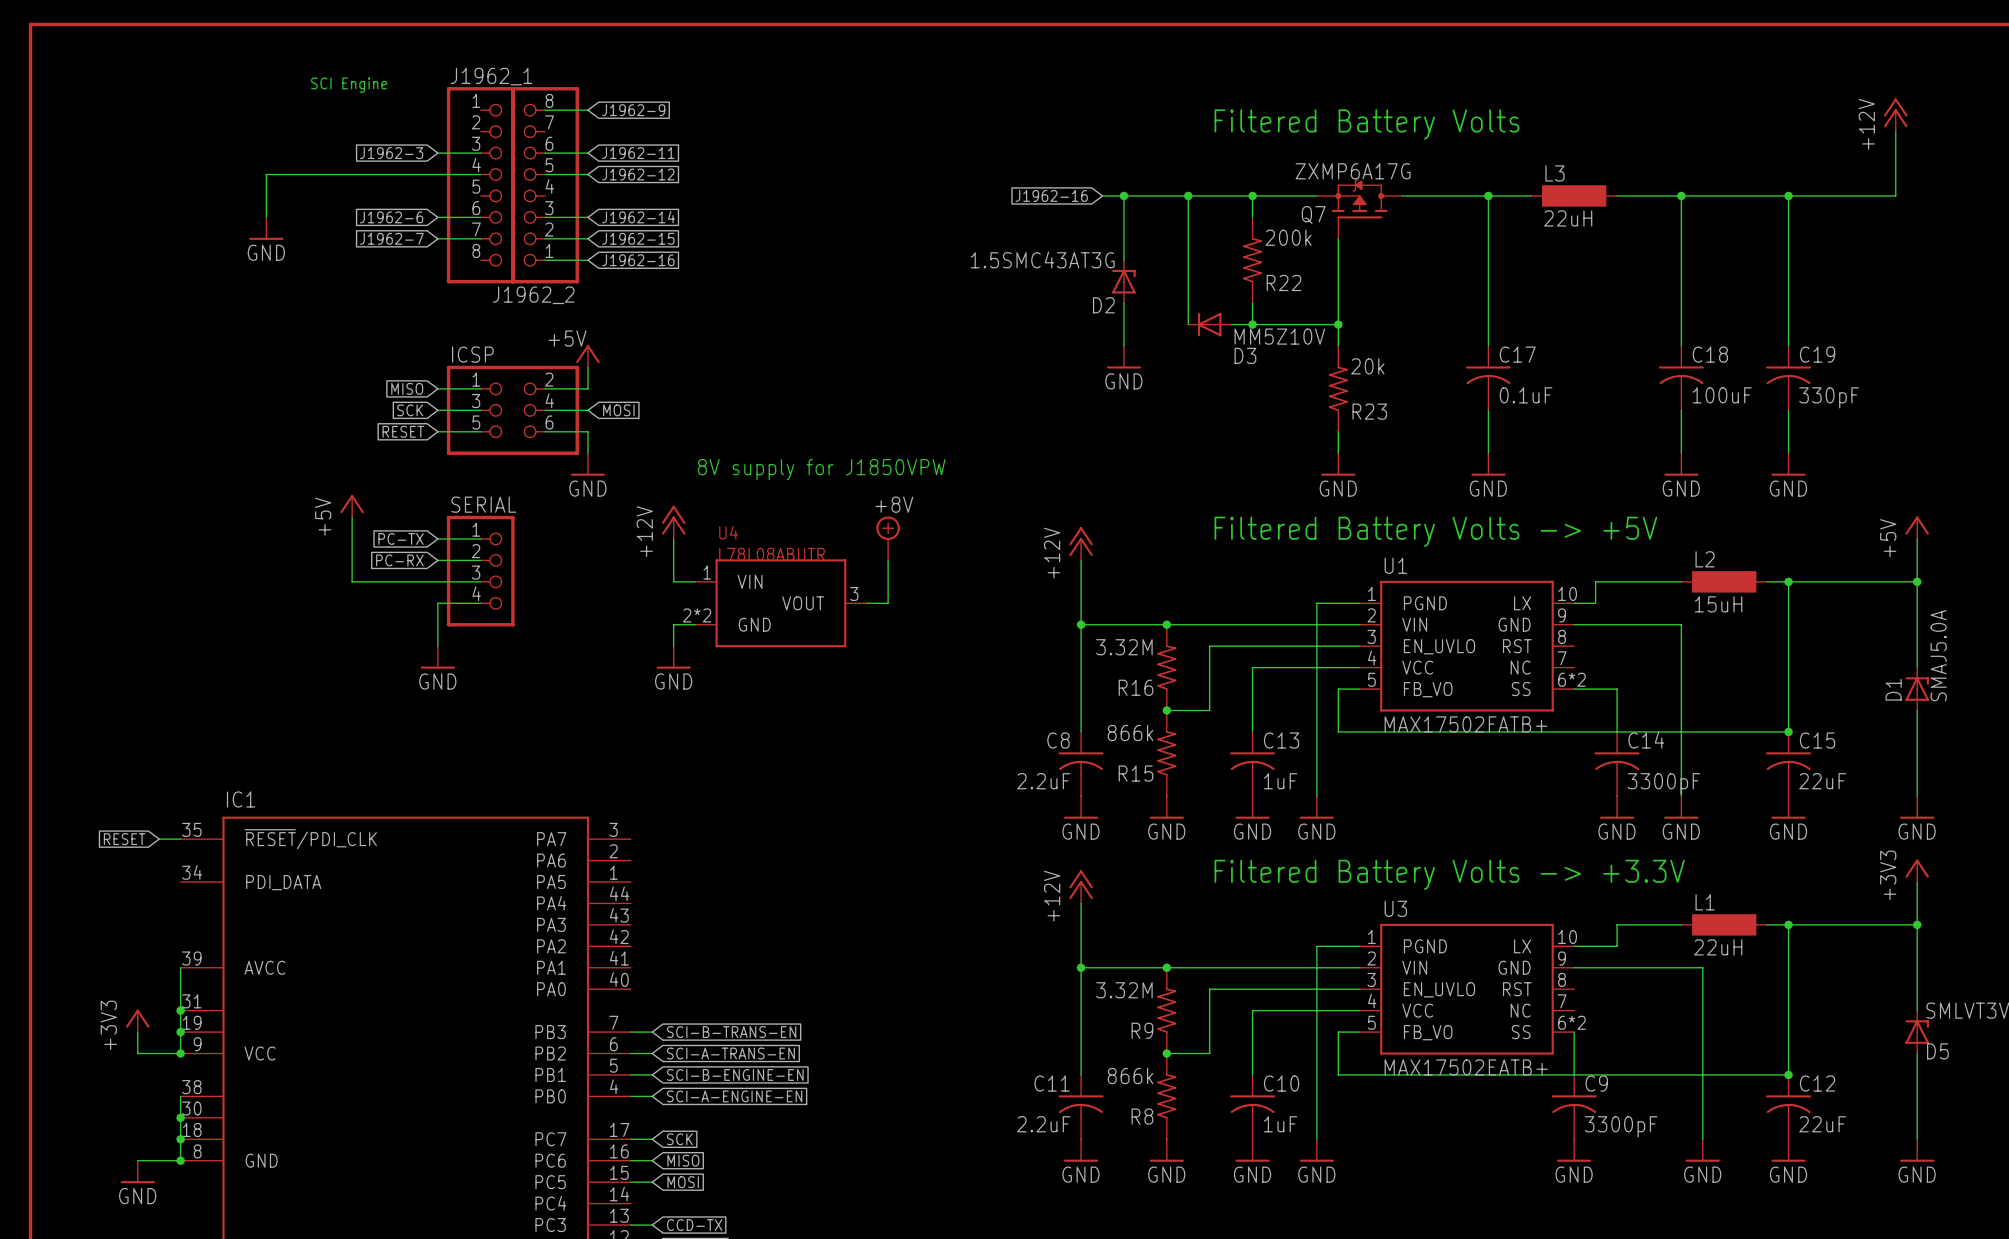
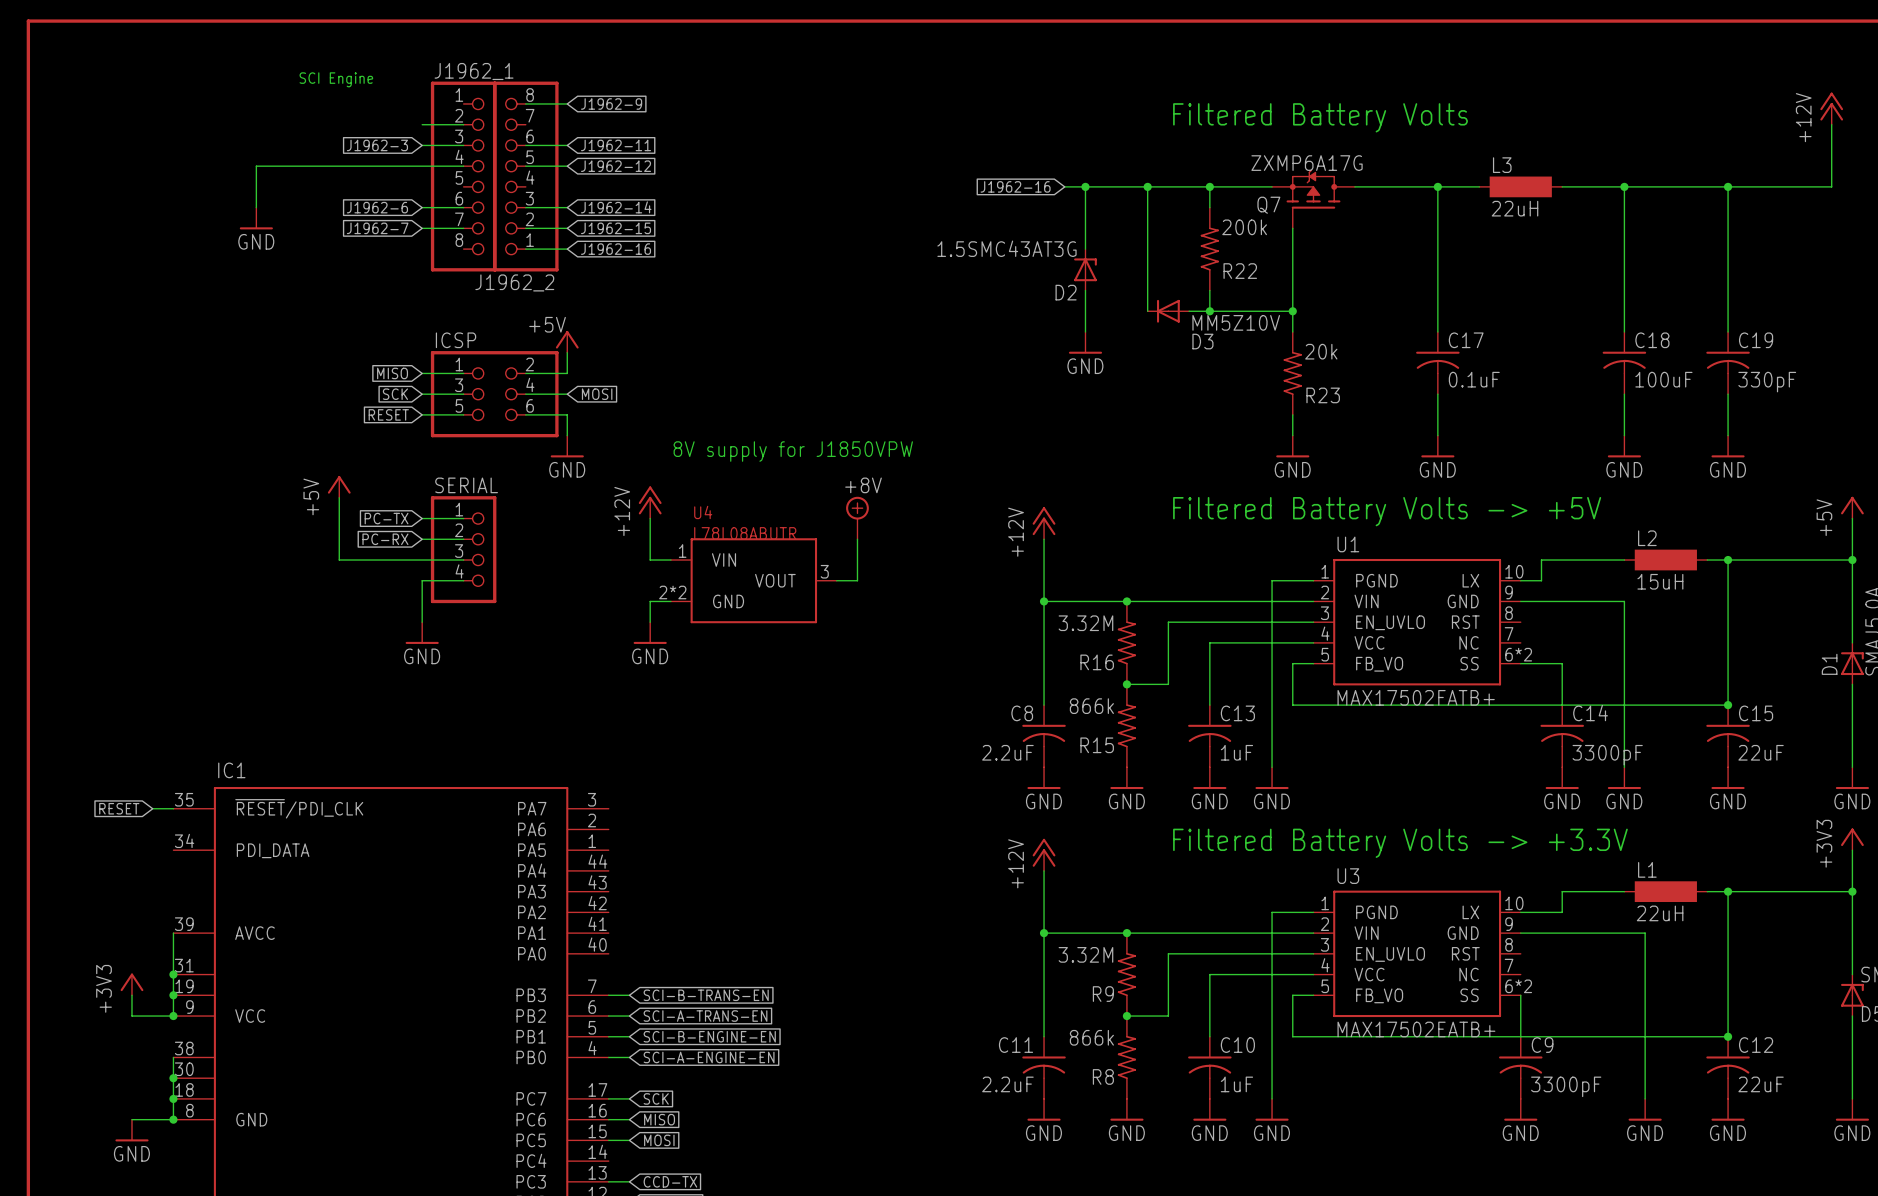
wire: none -> (422, 124) (463, 124)

